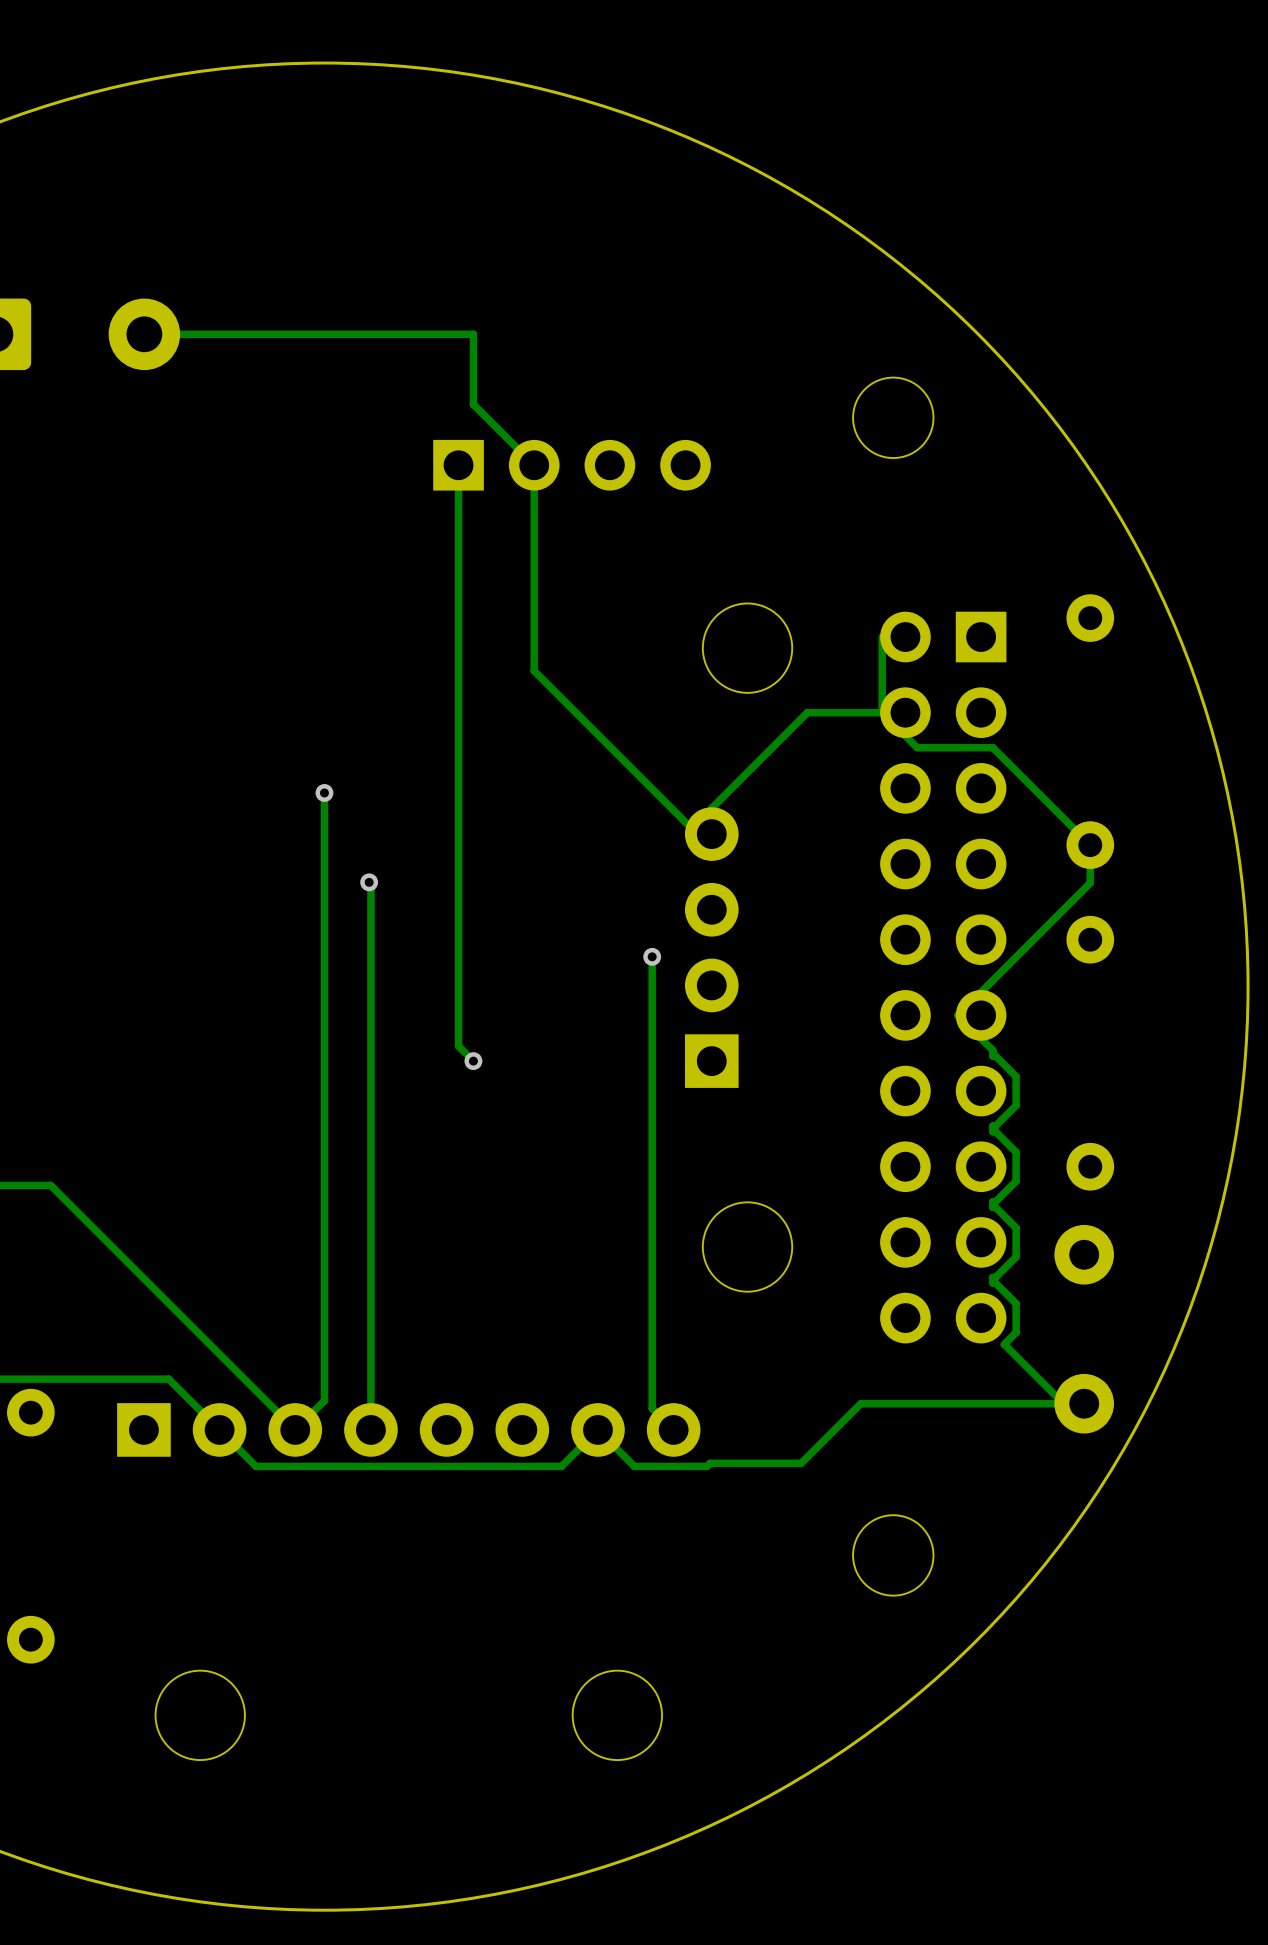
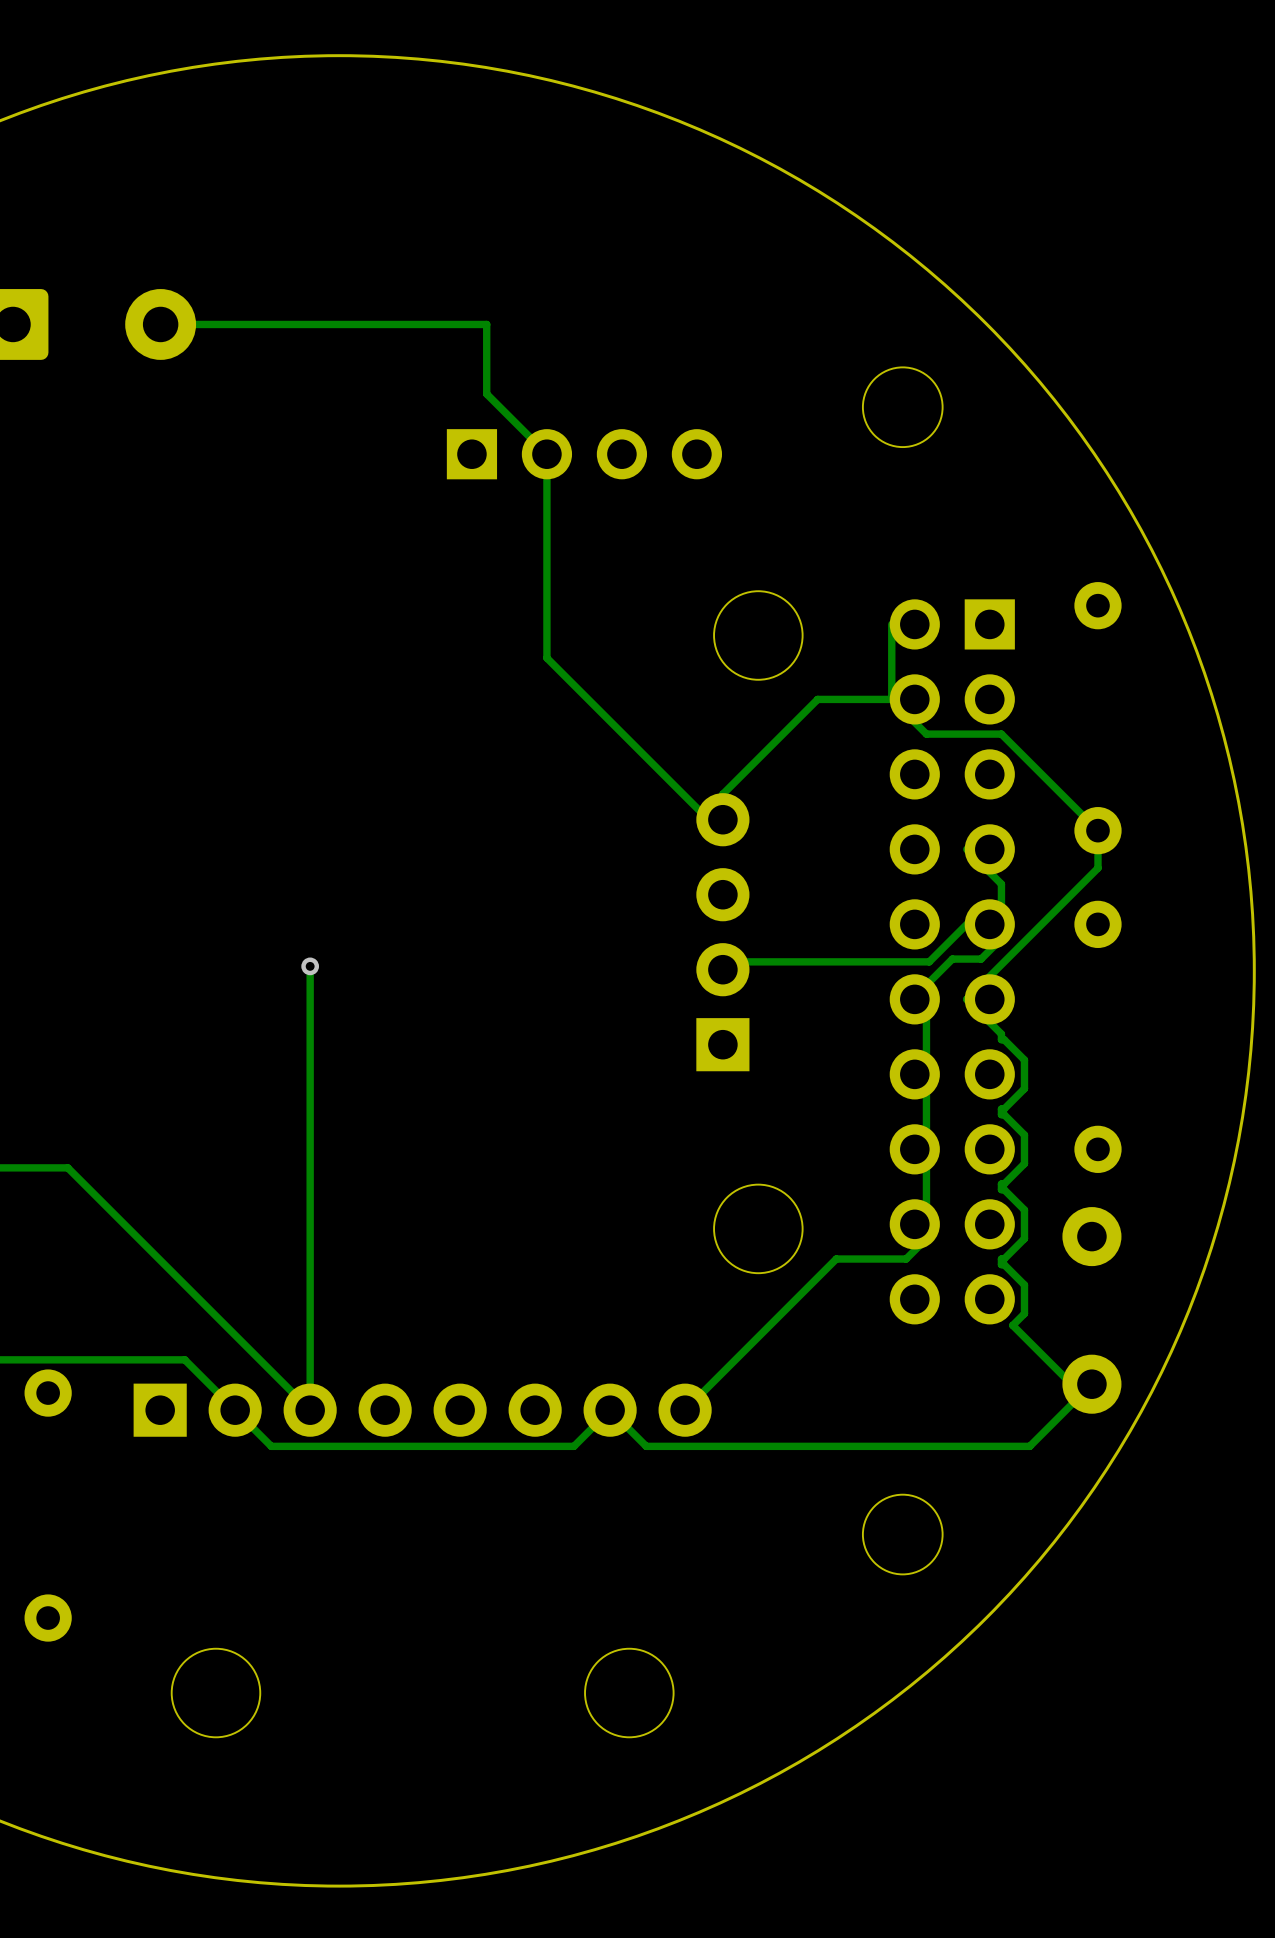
track: (458, 465) (458, 1046) (473, 1061) -> none
track: (324, 792) (324, 1400) (295, 1429) -> (310, 966) (310, 1410)
via: (324, 792) -> none
track: (369, 882) (370, 884) (370, 1429) -> none
via: (369, 882) -> none
track: none -> (966, 924) (929, 961) (705, 961)
track: (652, 956) (652, 1408) (673, 1429) -> (966, 849) (1001, 884) (1001, 938) (981, 959) (952, 959) (926, 985) (926, 1238) (906, 1259) (836, 1259) (685, 1410)
via: (652, 956) -> none
via: none -> (310, 966)
via: (473, 1061) -> none
track: (1063, 1403) (860, 1403) (801, 1463) (710, 1463) (707, 1466) -> (1091, 1384) (1029, 1446) (718, 1446)

